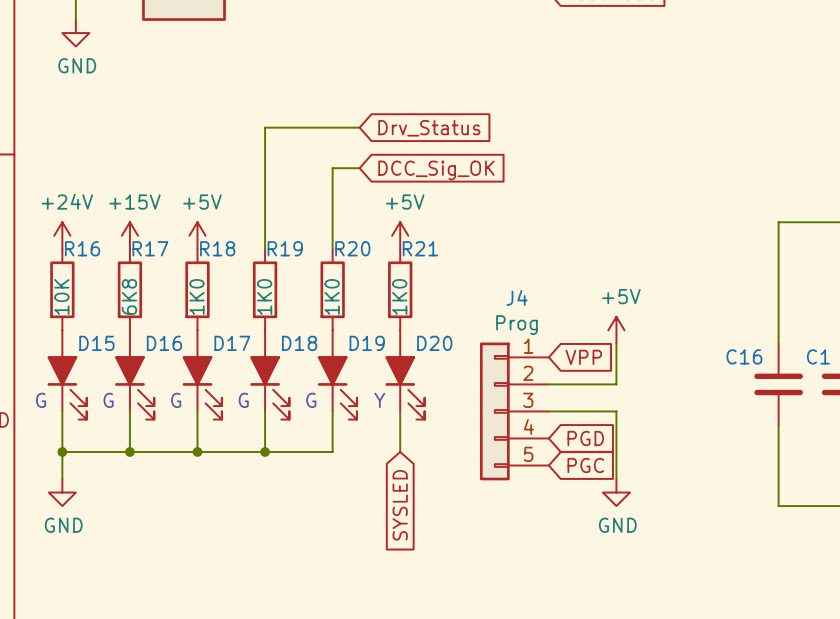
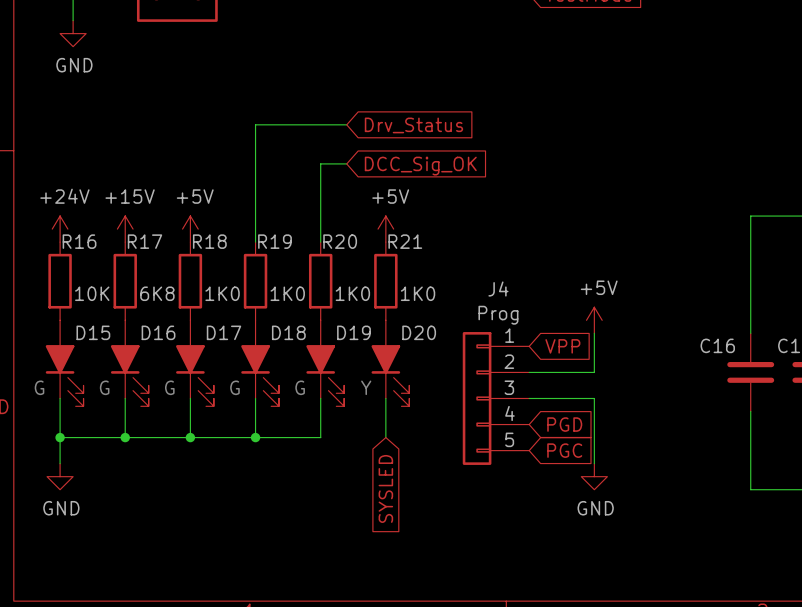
R16 value rotation: 0° (61, 297) -> 90° clockwise (92, 293)
R17 value rotation: 0° (129, 297) -> 90° clockwise (157, 293)
R18 value rotation: 0° (196, 297) -> 90° clockwise (222, 293)
R19 value rotation: 0° (264, 297) -> 90° clockwise (287, 293)
R20 value rotation: 0° (332, 297) -> 90° clockwise (352, 293)
R21 value rotation: 0° (399, 297) -> 90° clockwise (418, 293)

